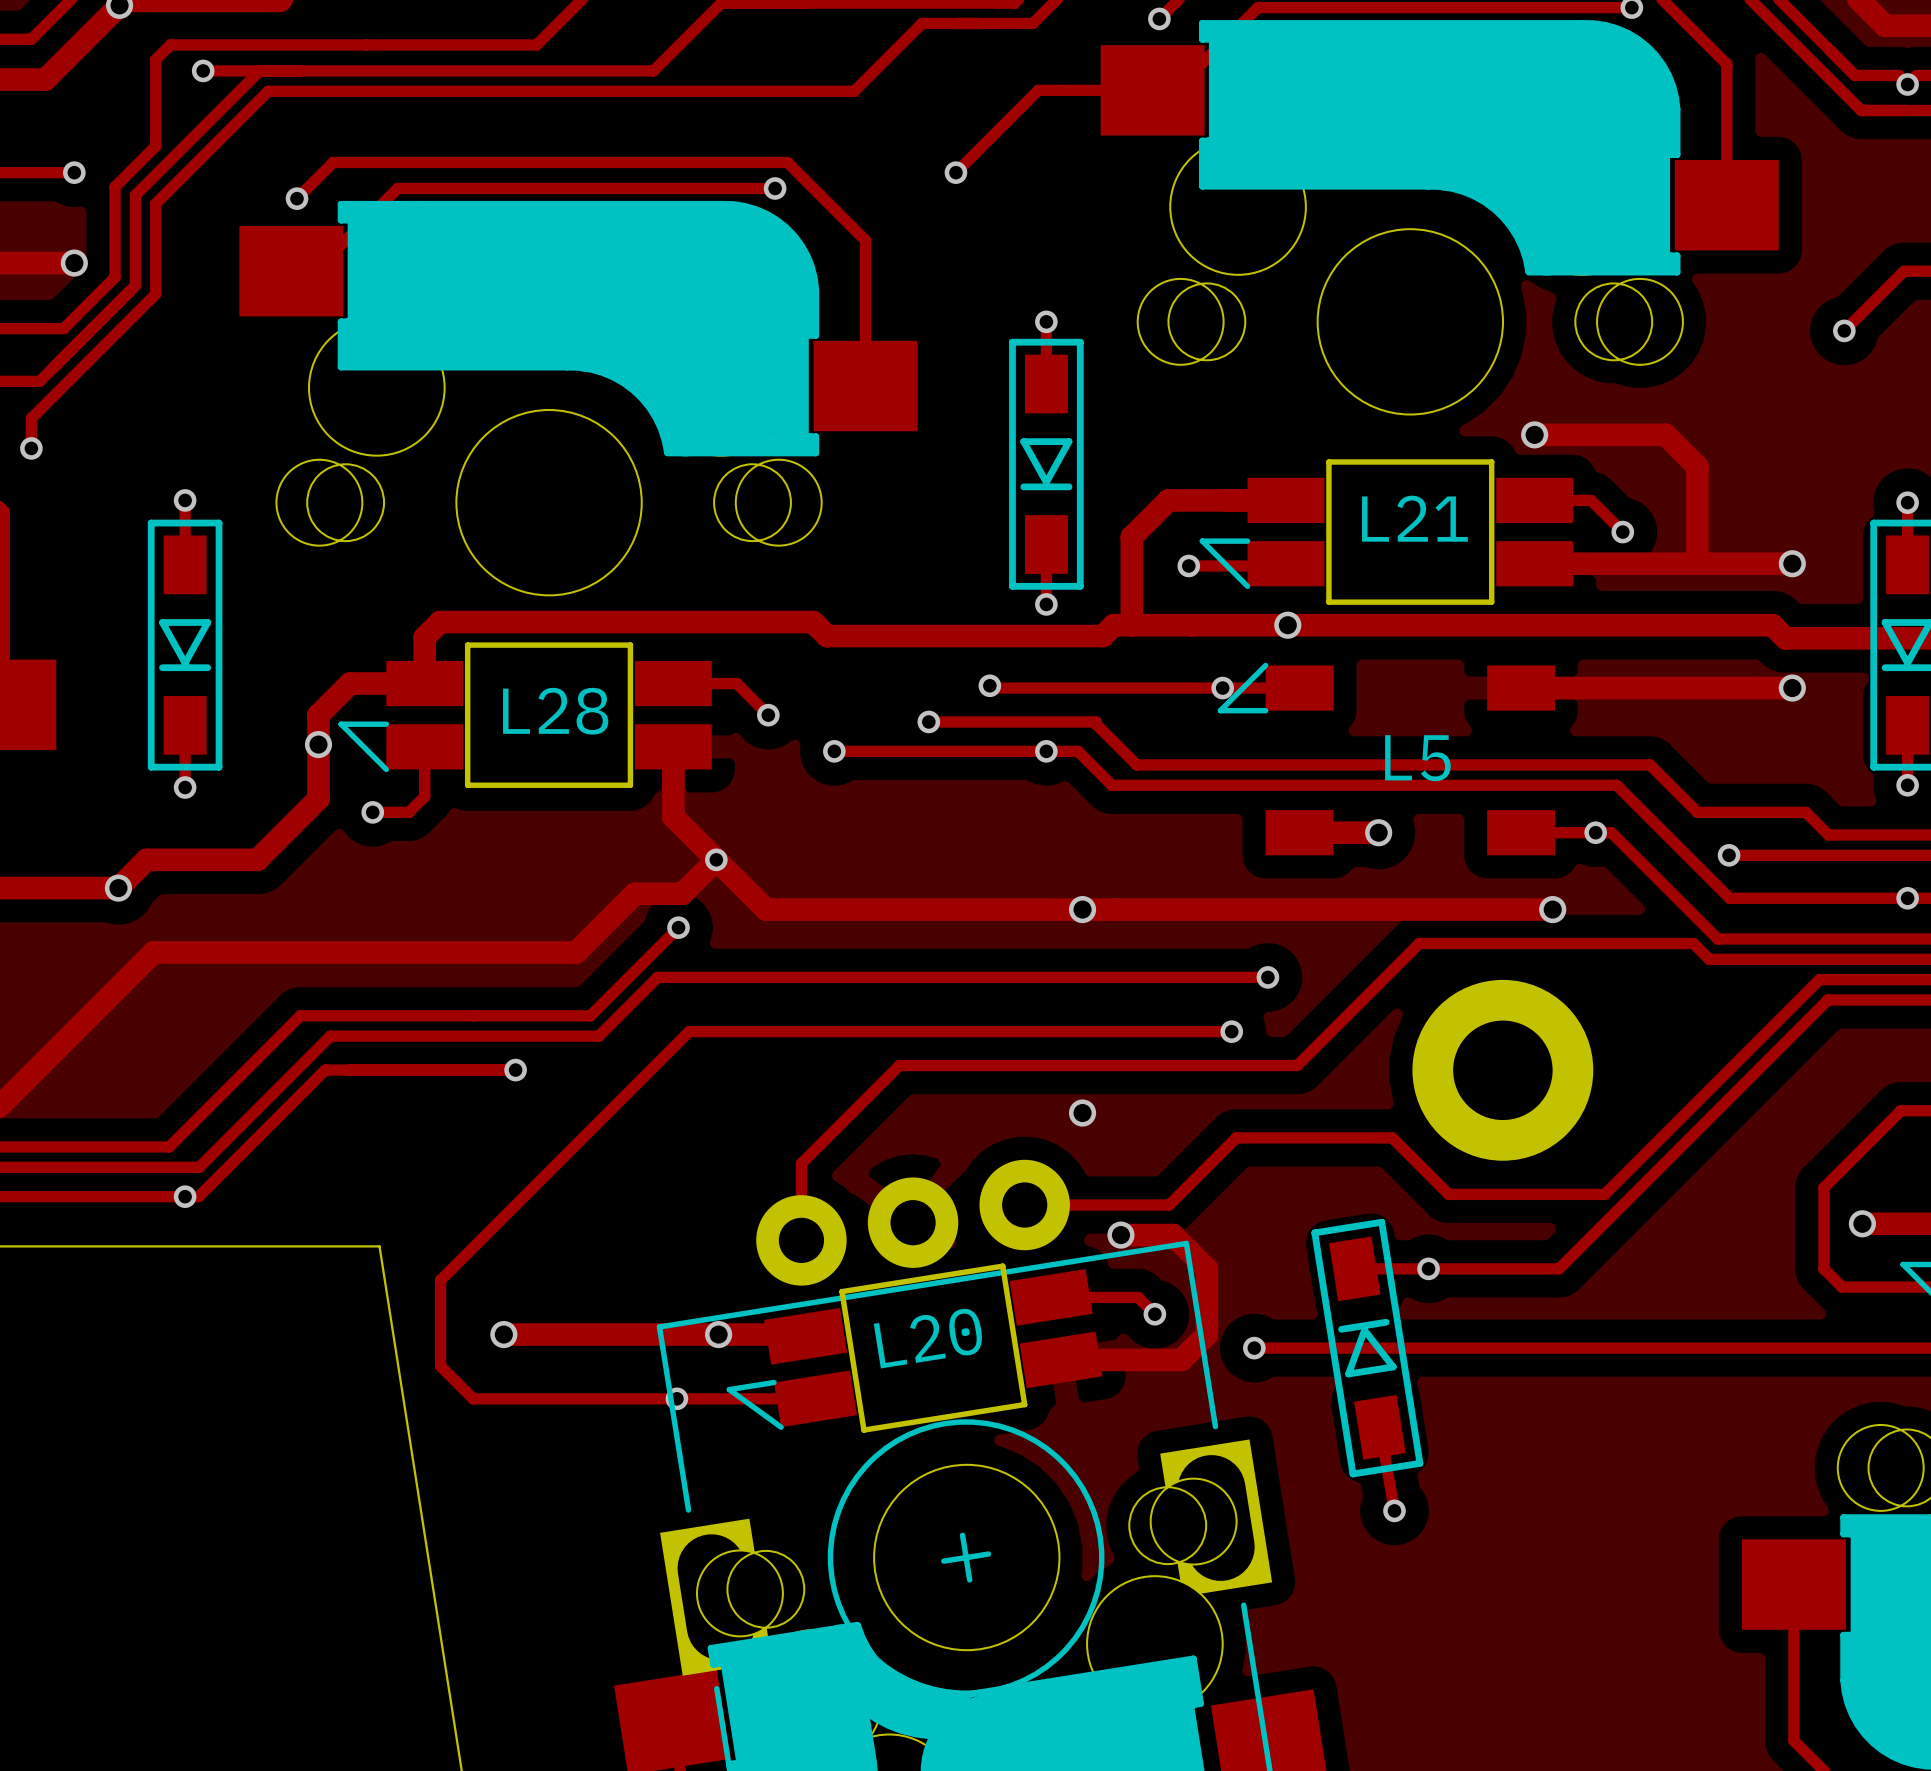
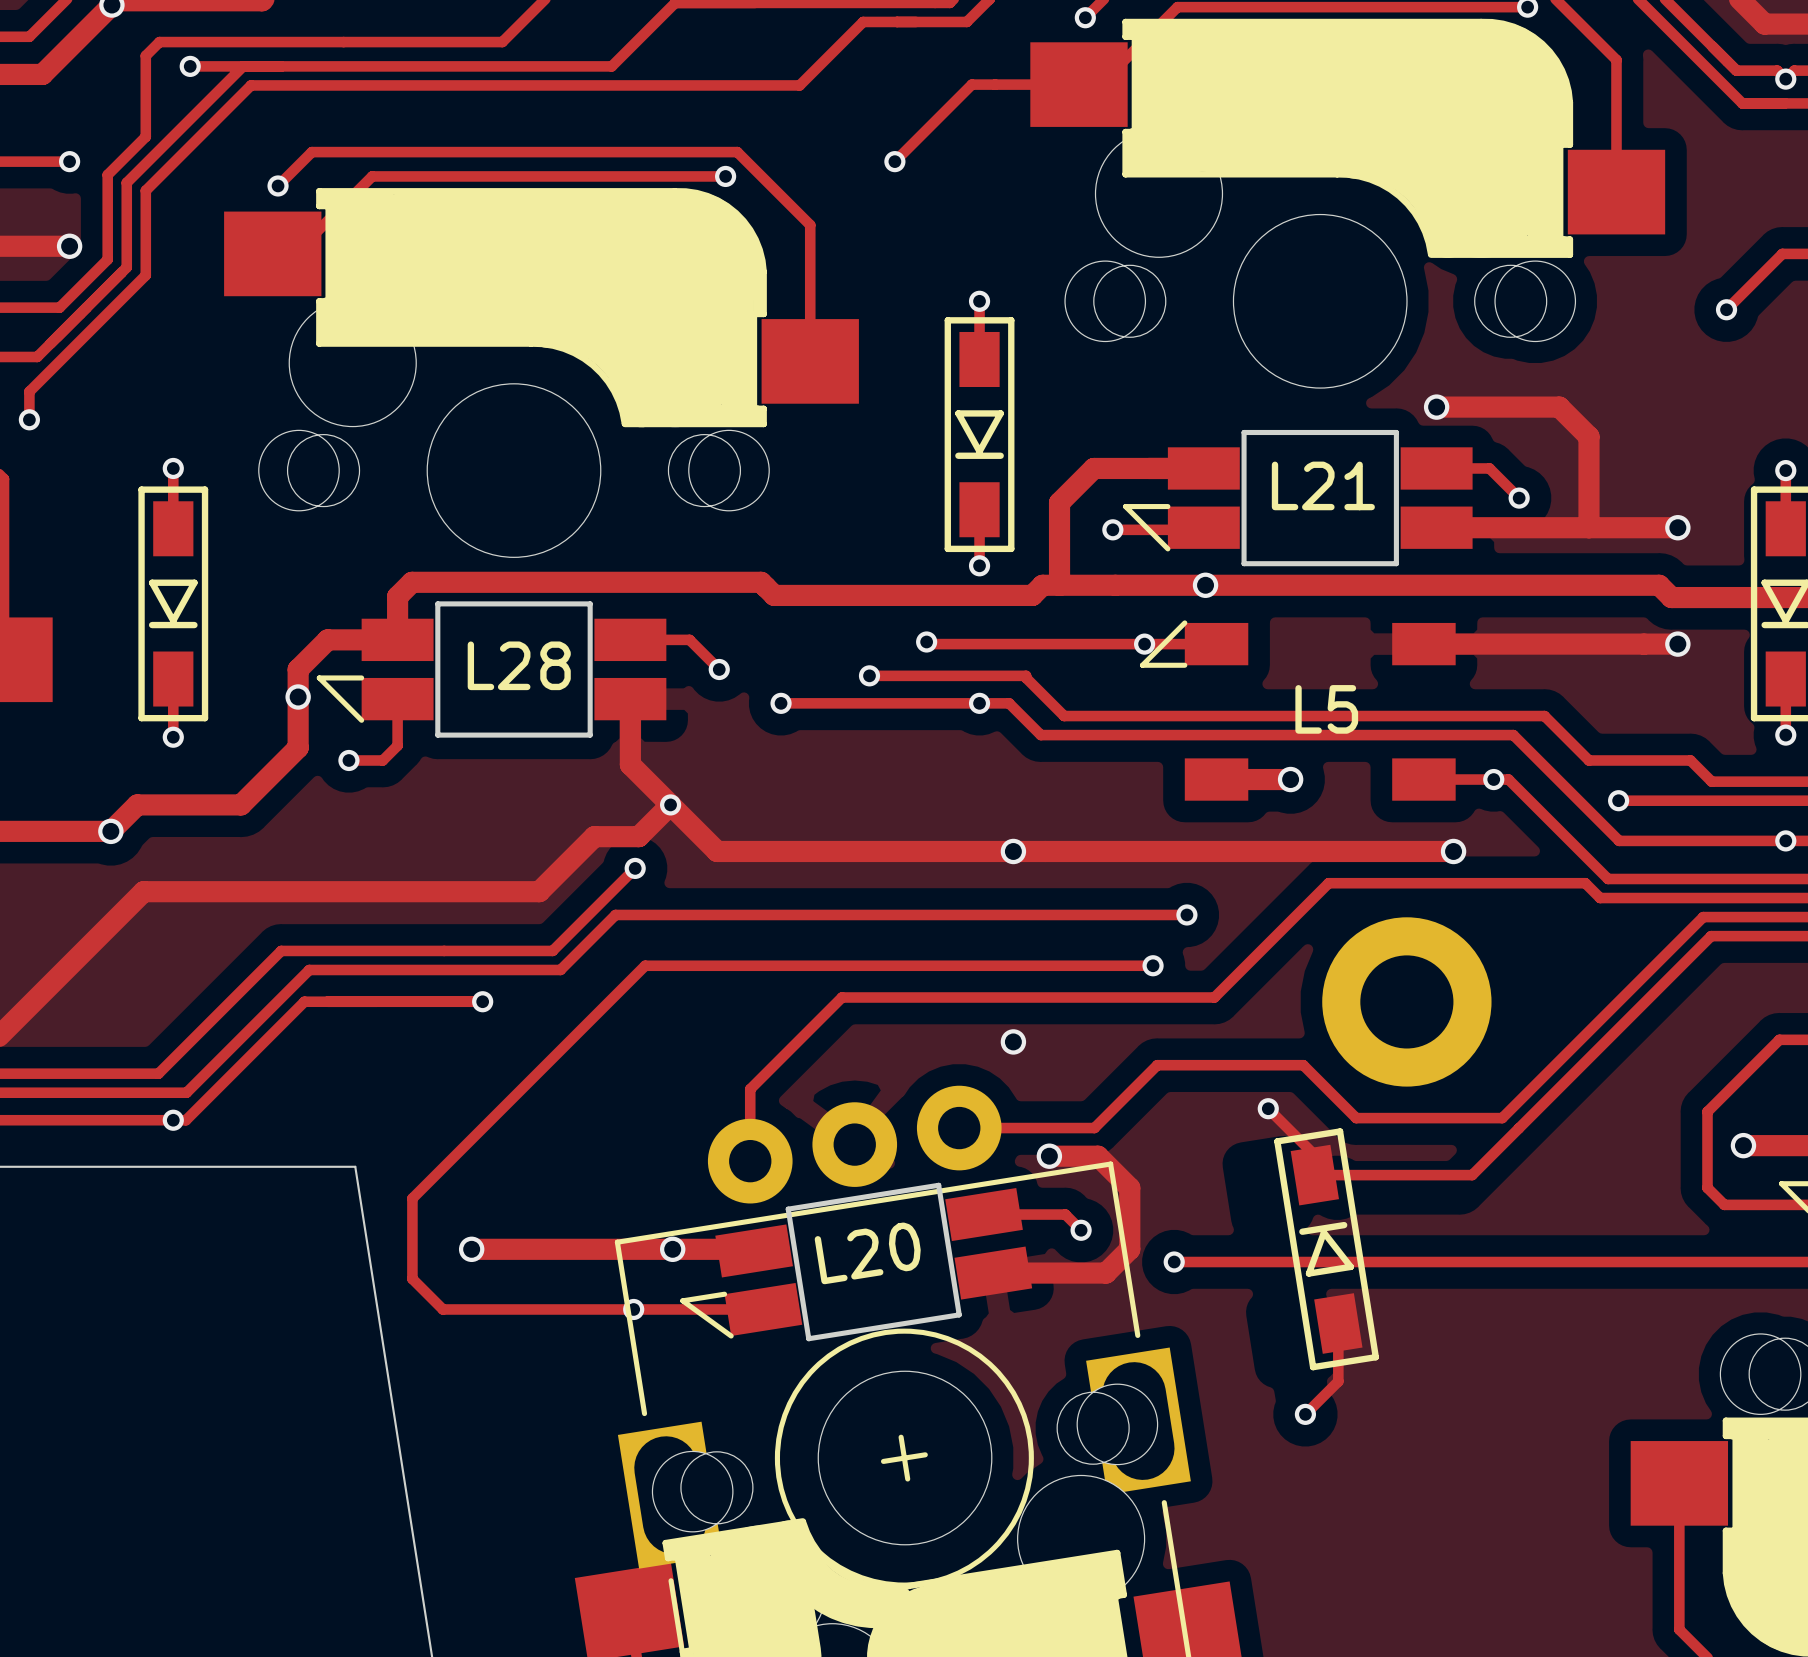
track: (1572, 1255) (1559, 1268) (1354, 1268) -> (1472, 1175) (1314, 1175) (1314, 1155) (1268, 1108)
via position: (1428, 1268) -> (1268, 1108)
part position: (1367, 1348) -> (1326, 1249)
track: (1379, 1427) (1394, 1510) -> (1338, 1323) (1338, 1381) (1305, 1414)

